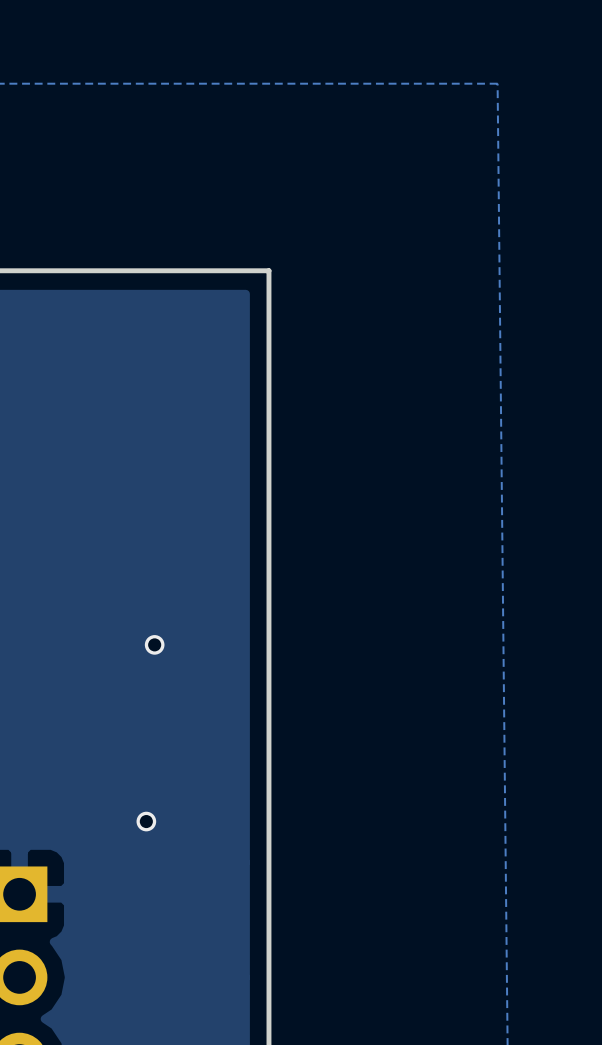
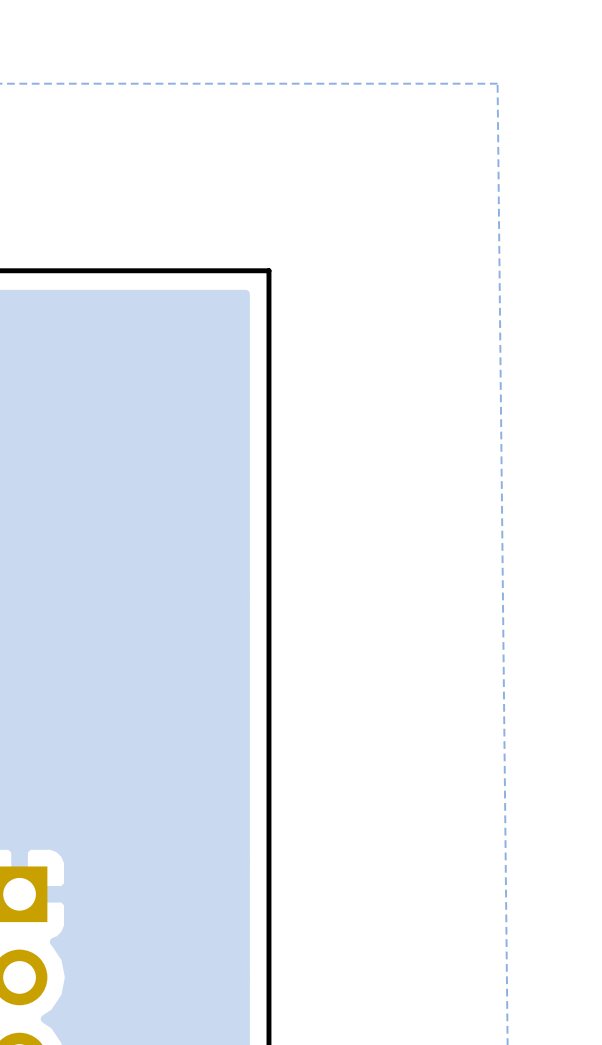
via: (154, 644) -> none
via: (146, 821) -> none

